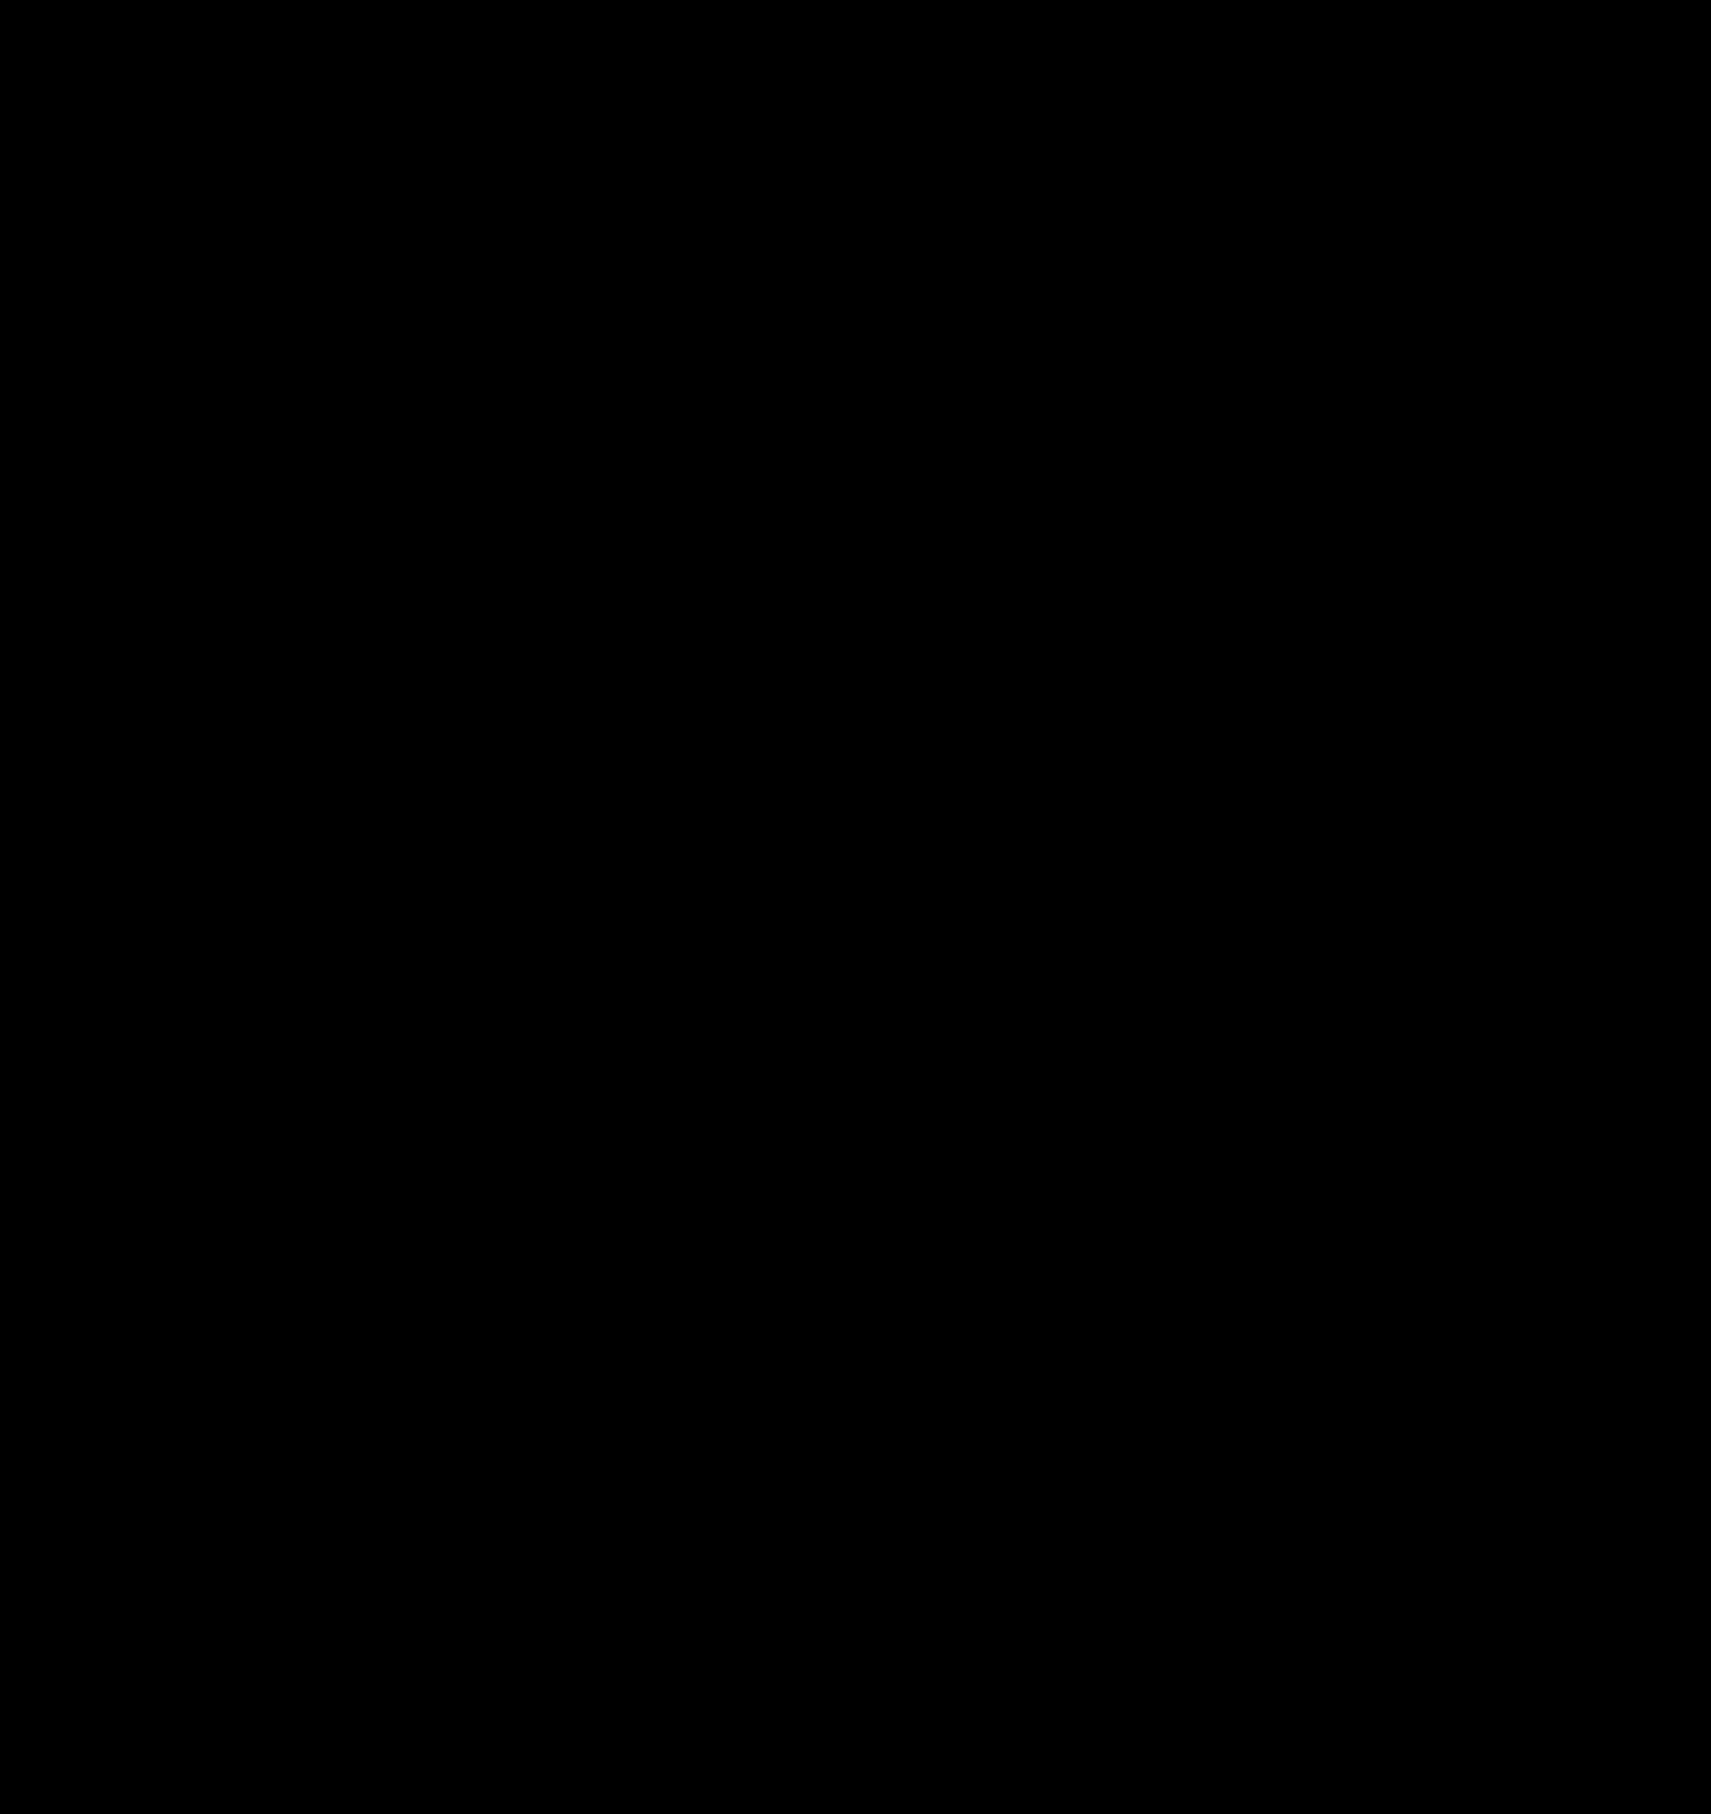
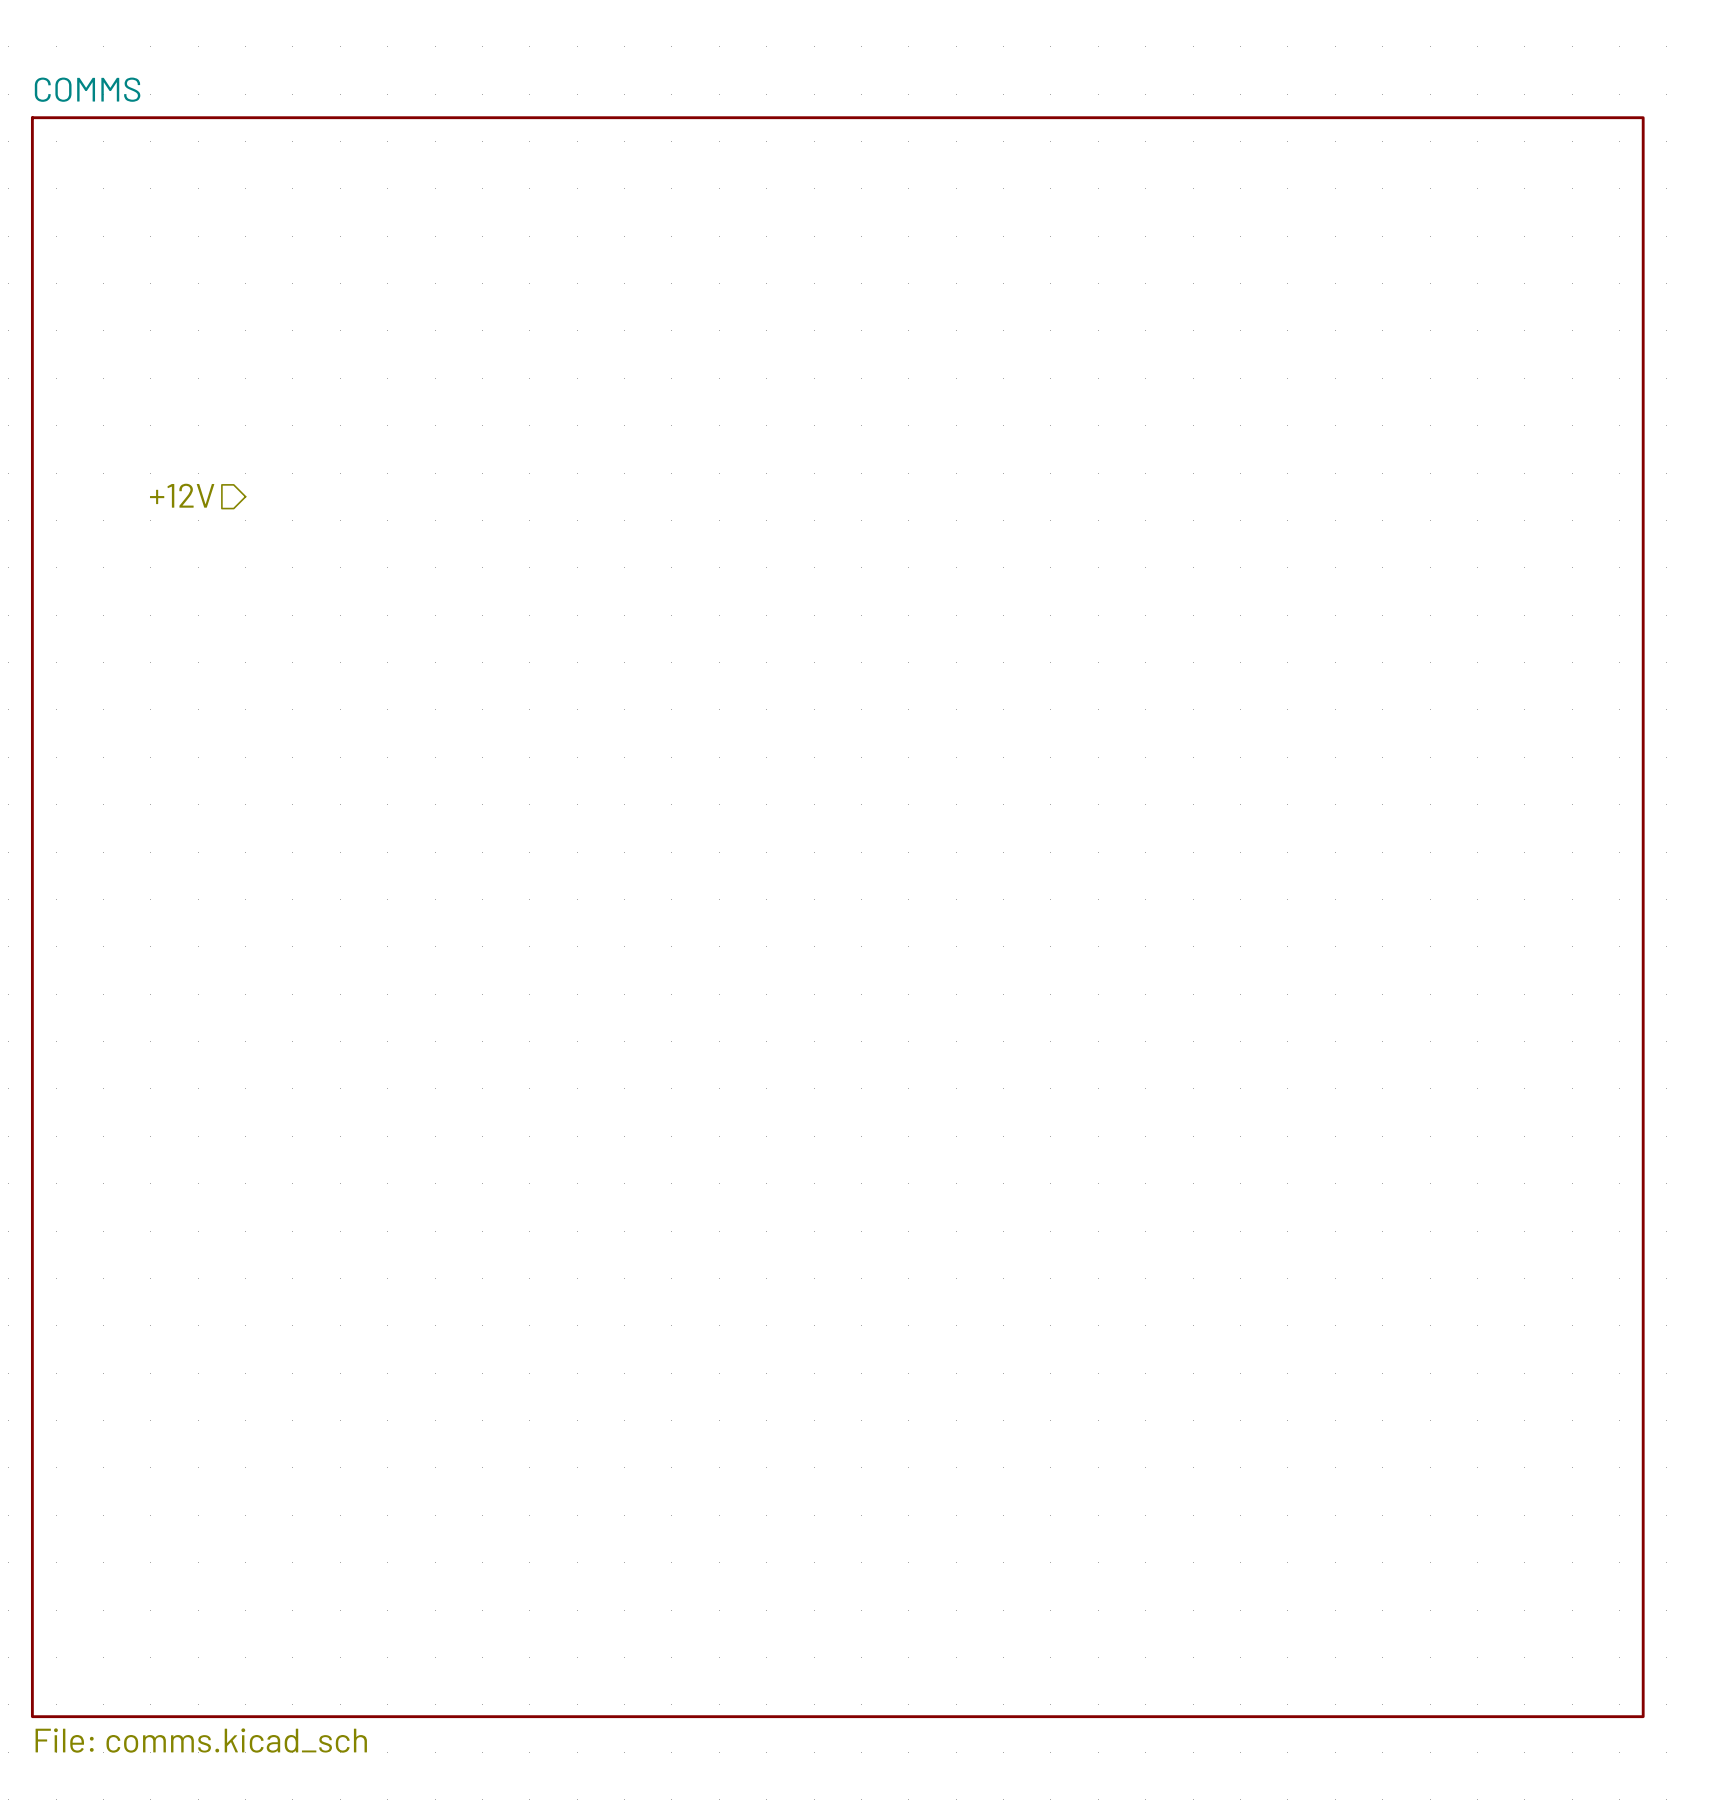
hierarchical label: none -> +12V (182, 495)
sheet COMMS: none -> File: comms.kicad_sch (837, 917)

